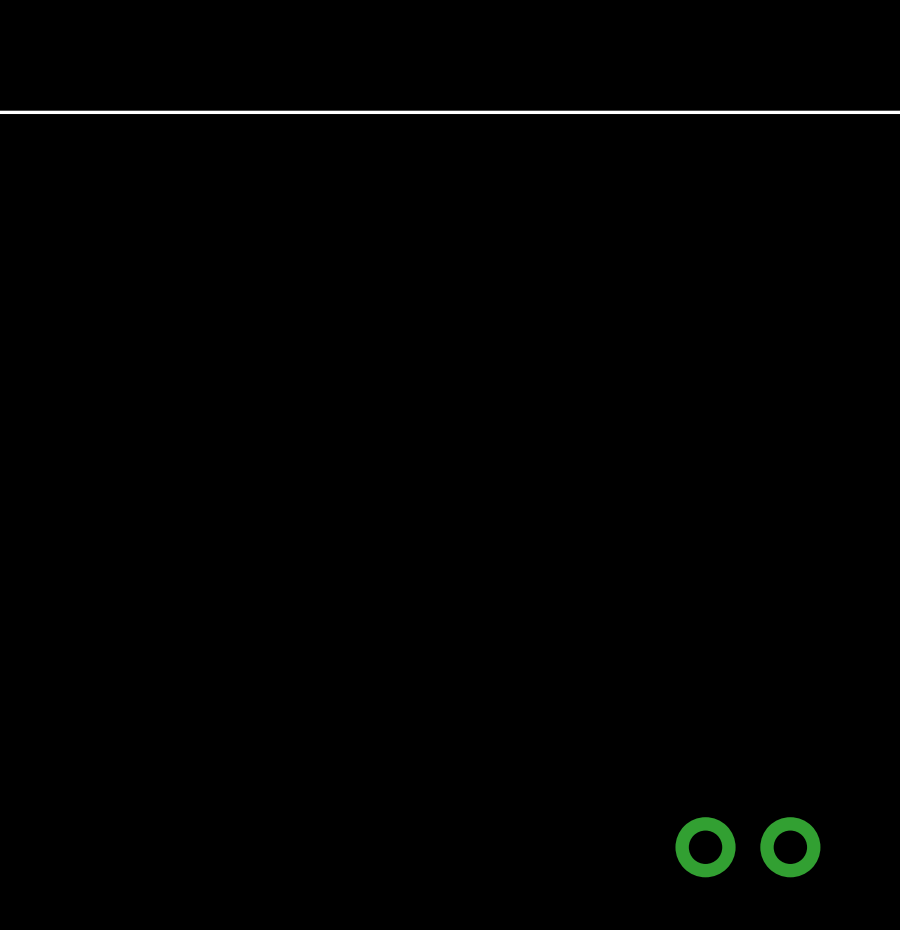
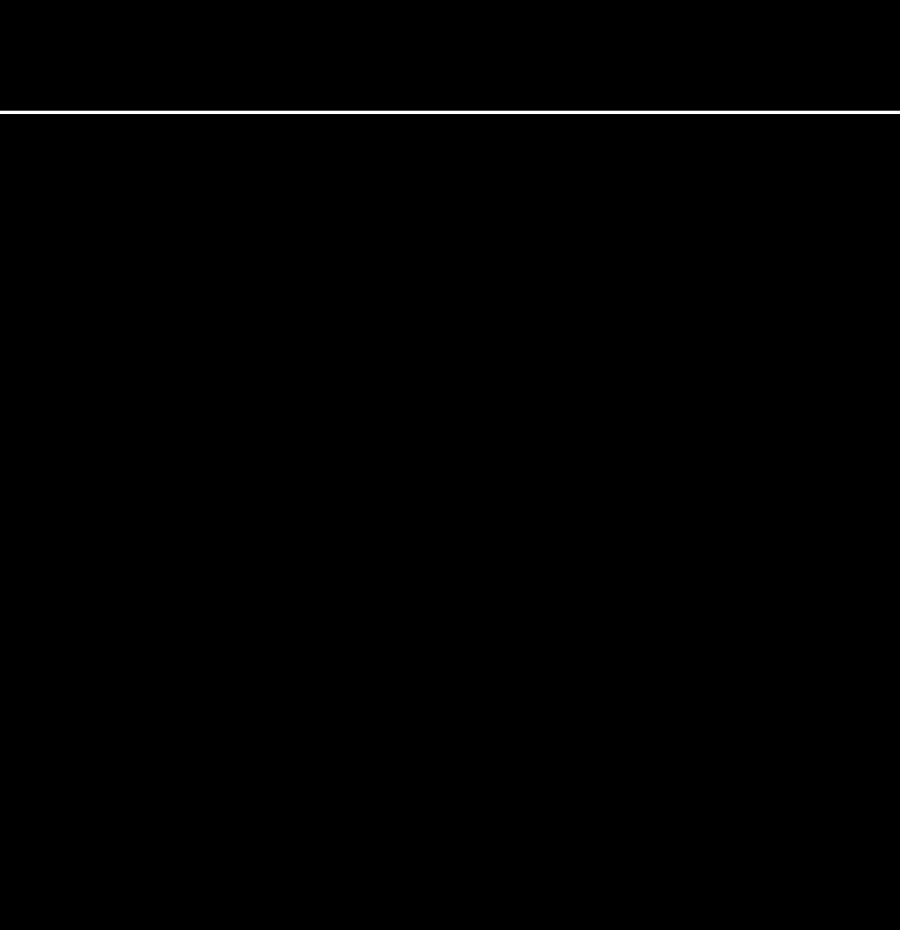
part: (747, 847) -> none

